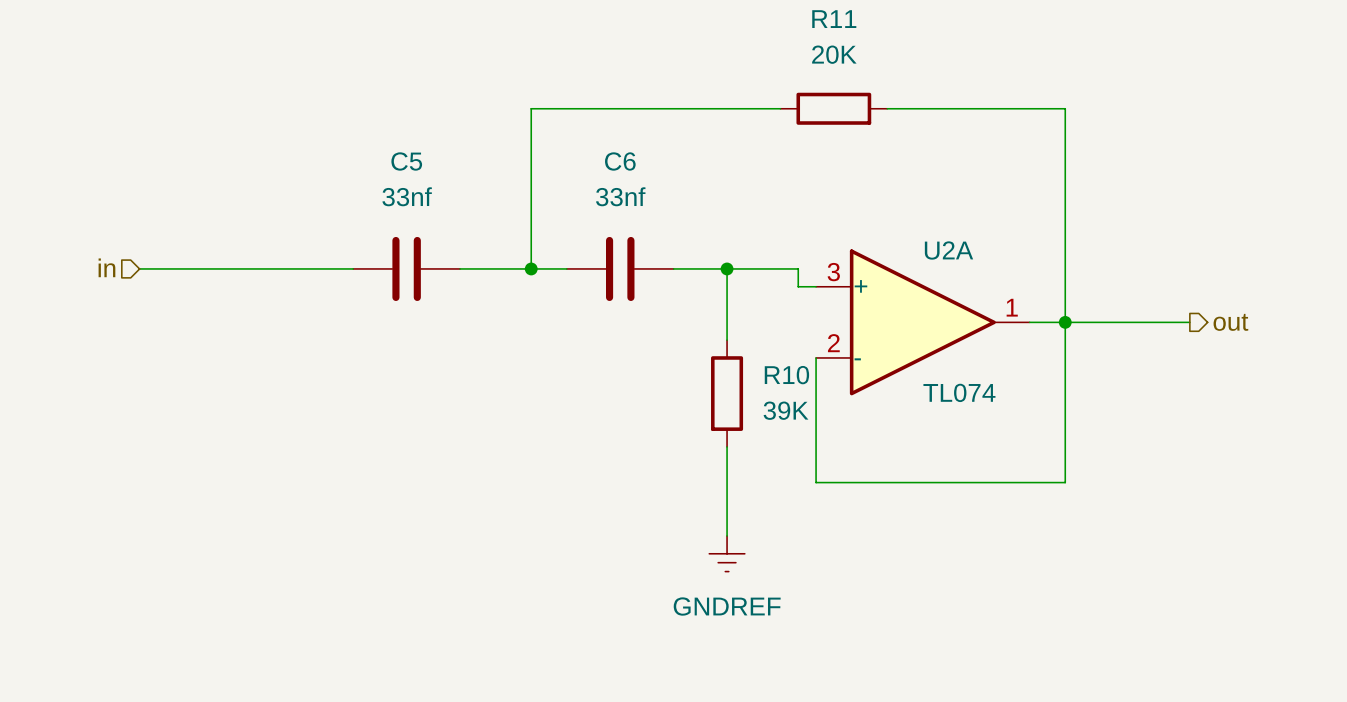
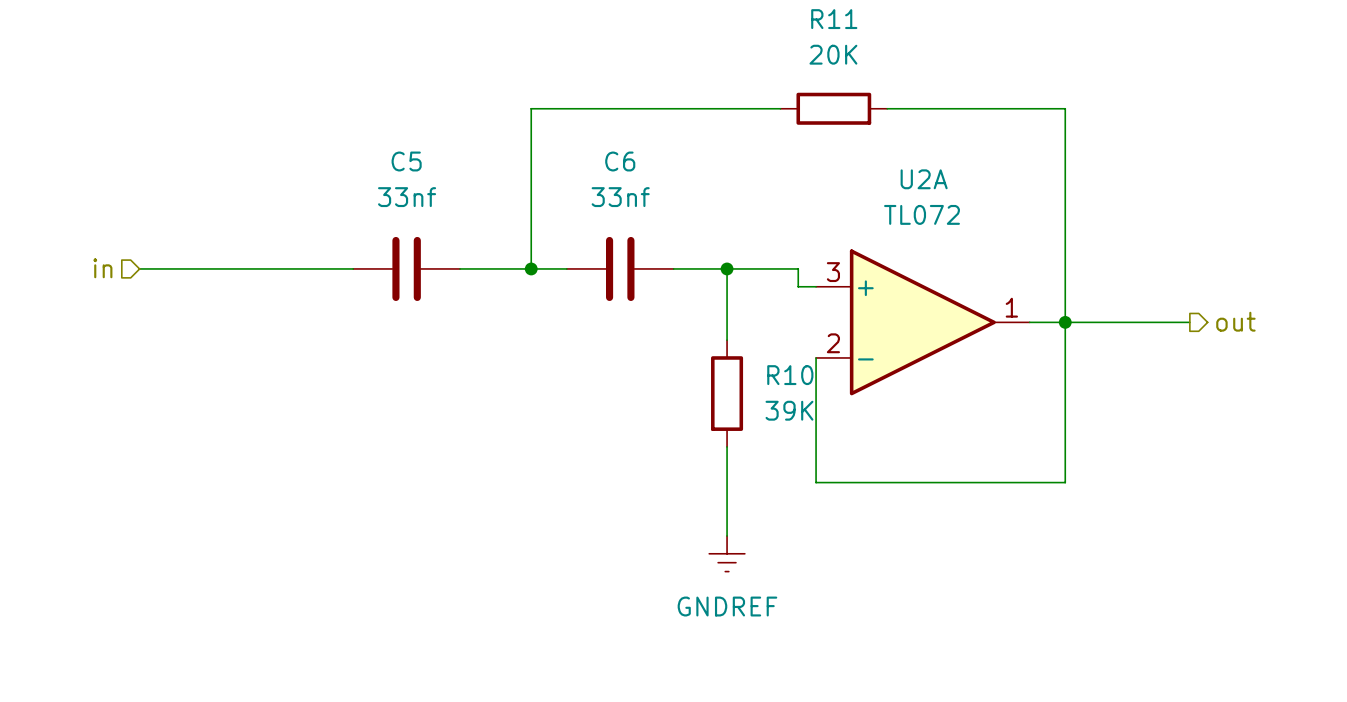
U2A name position: U2A (948, 250) -> U2A (924, 179)
U2A value: TL074 (959, 392) -> TL072 (922, 214)

